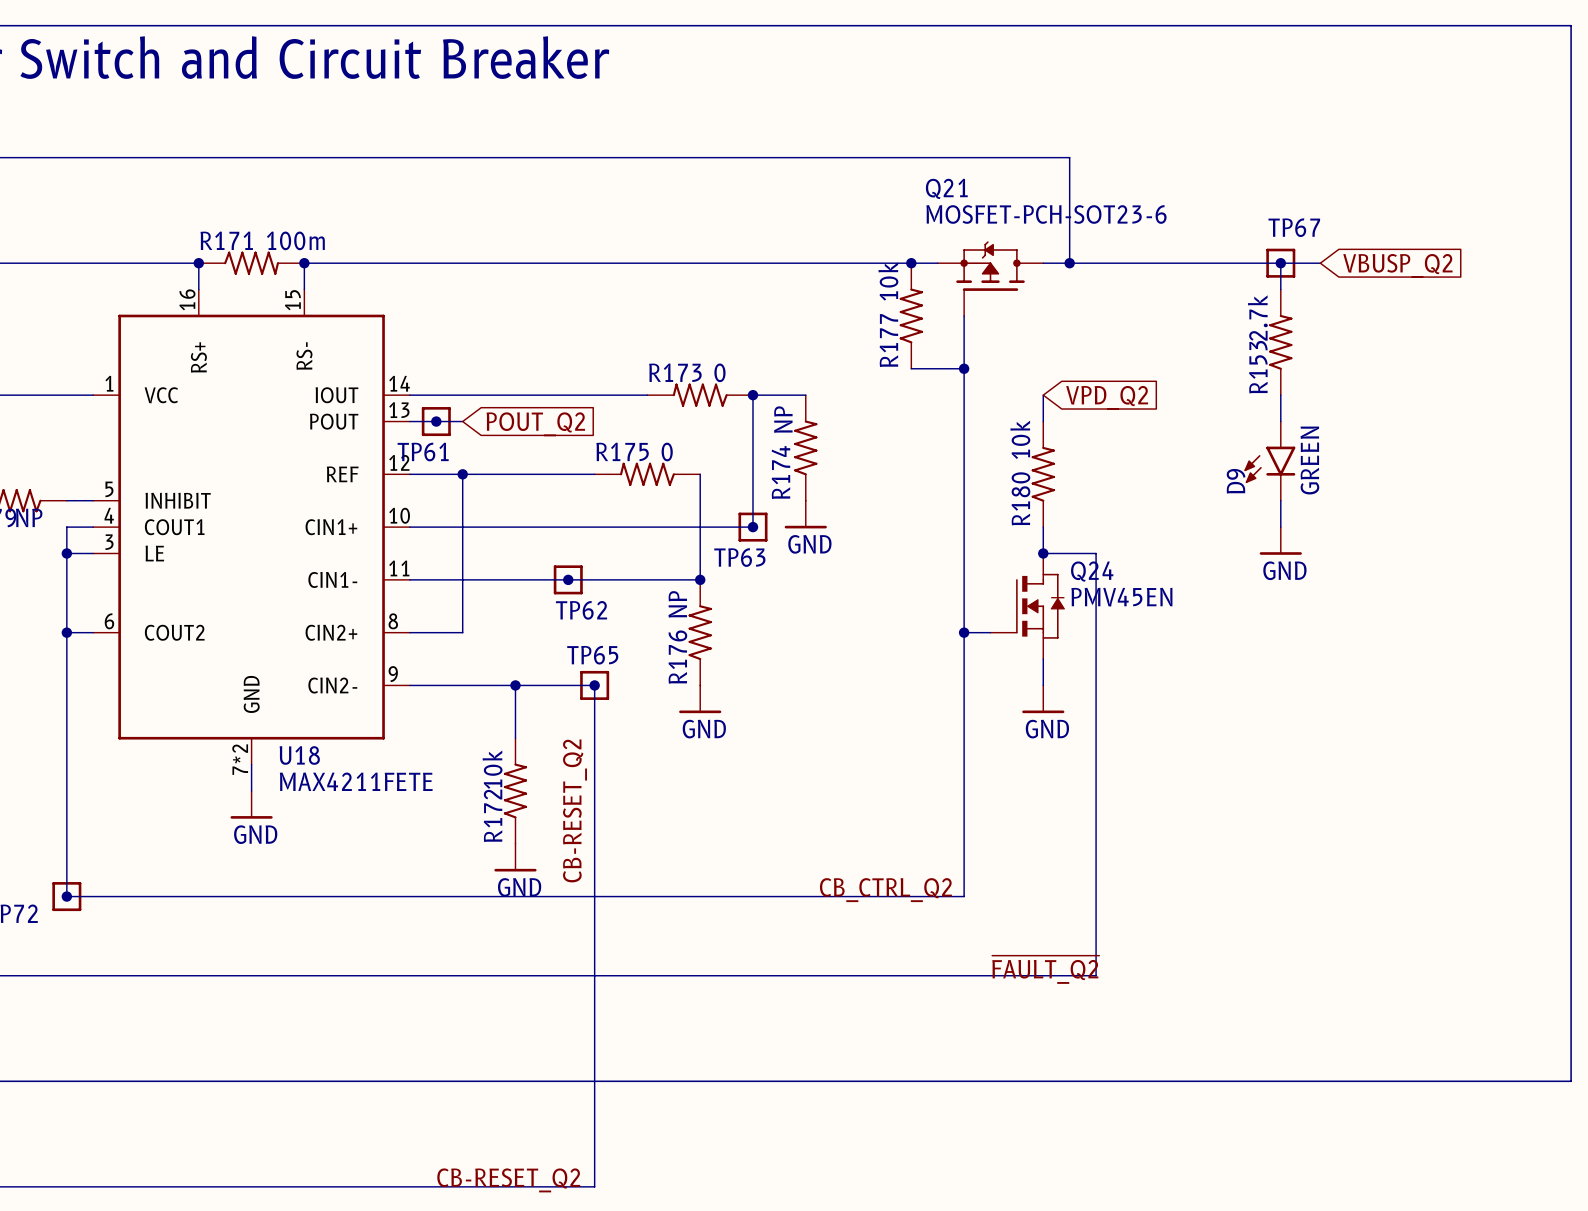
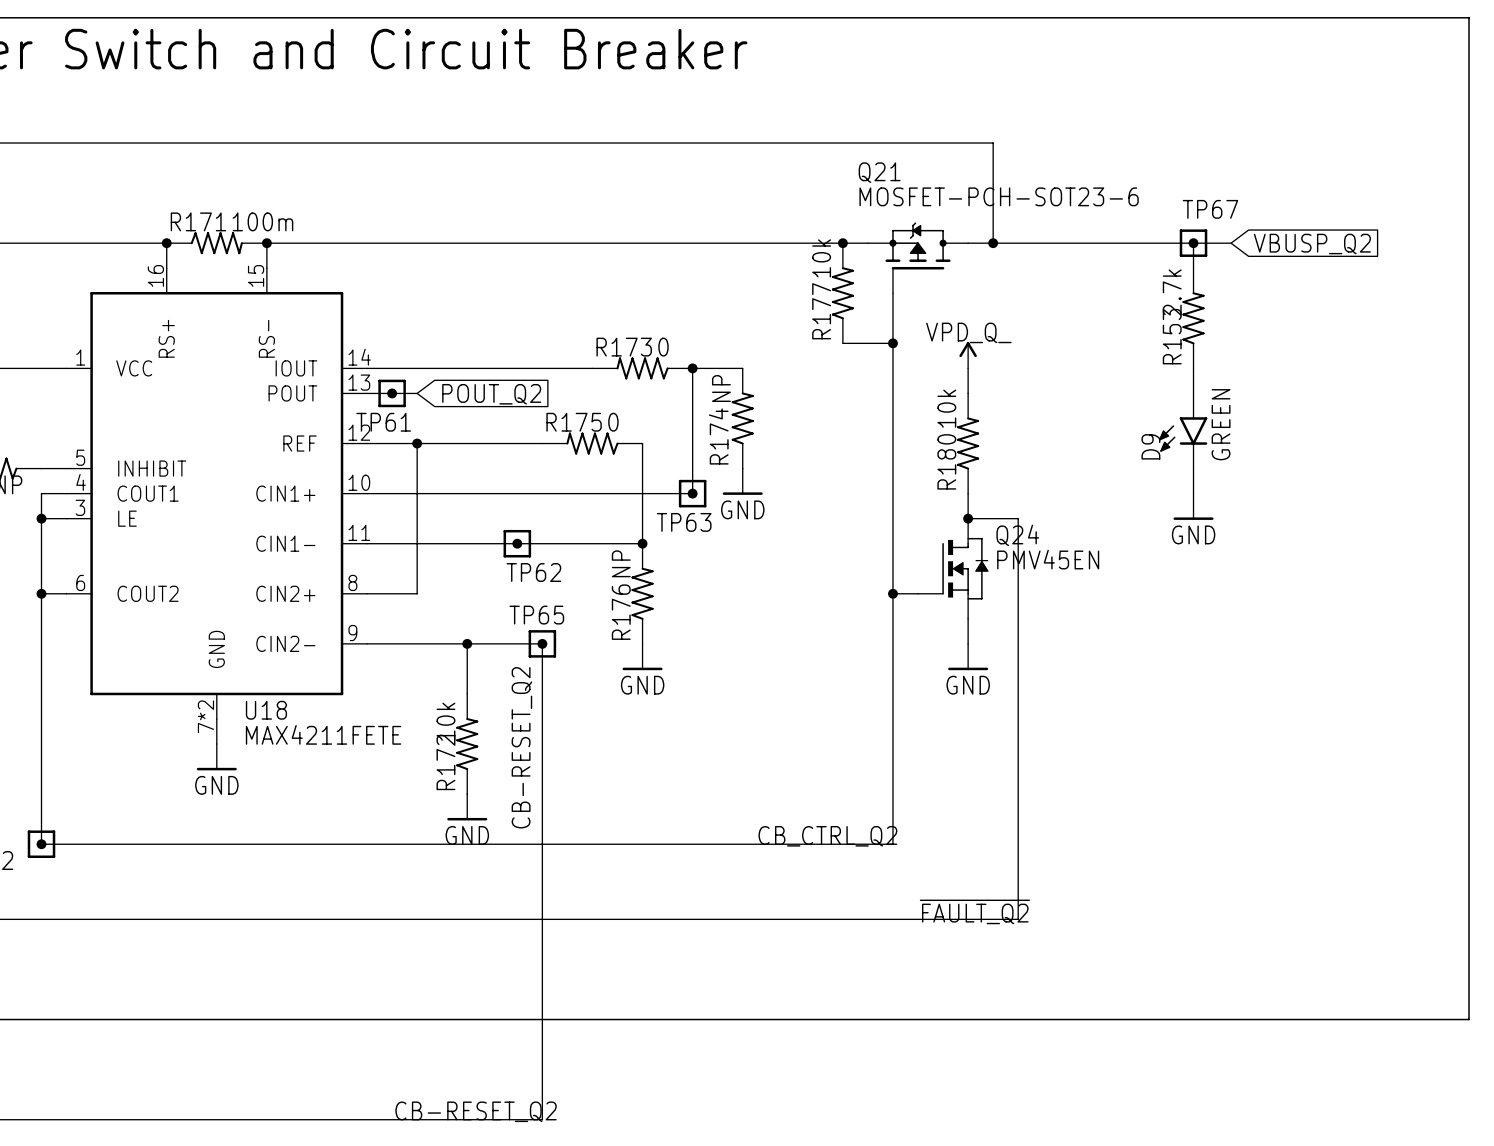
power symbol: none -> VPD_Q_ (968, 355)
global label: VPD_Q2 (1107, 397) -> none

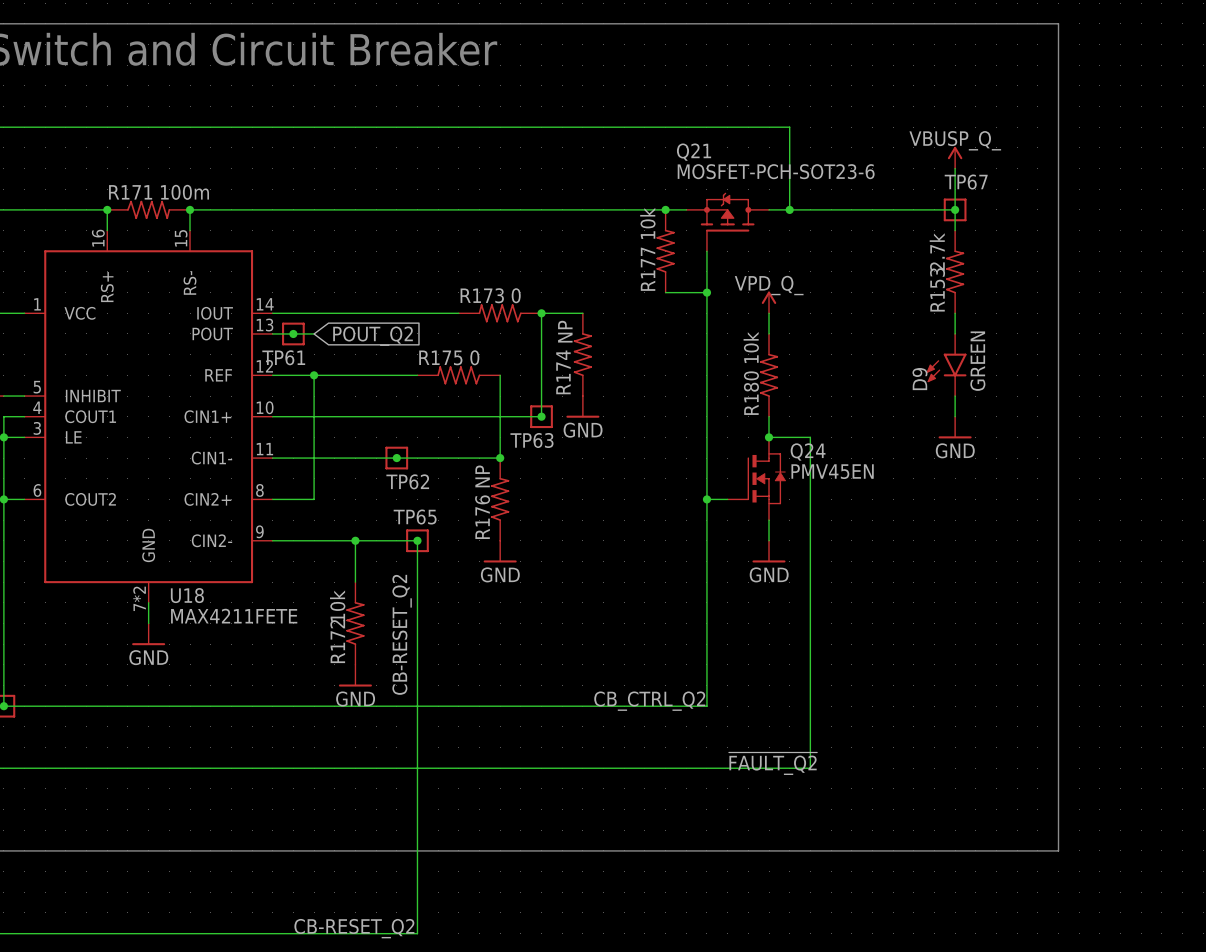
line: (1318, 17) (1468, 17) (1468, 1019) (1318, 1019) -> (1058, 23) (1058, 850)
power symbol: none -> VBUSP_Q_ (955, 157)
wire: (1193, 243) (1231, 243) -> (955, 209) (955, 168)
global label: VBUSP_Q2 (1312, 244) -> none

